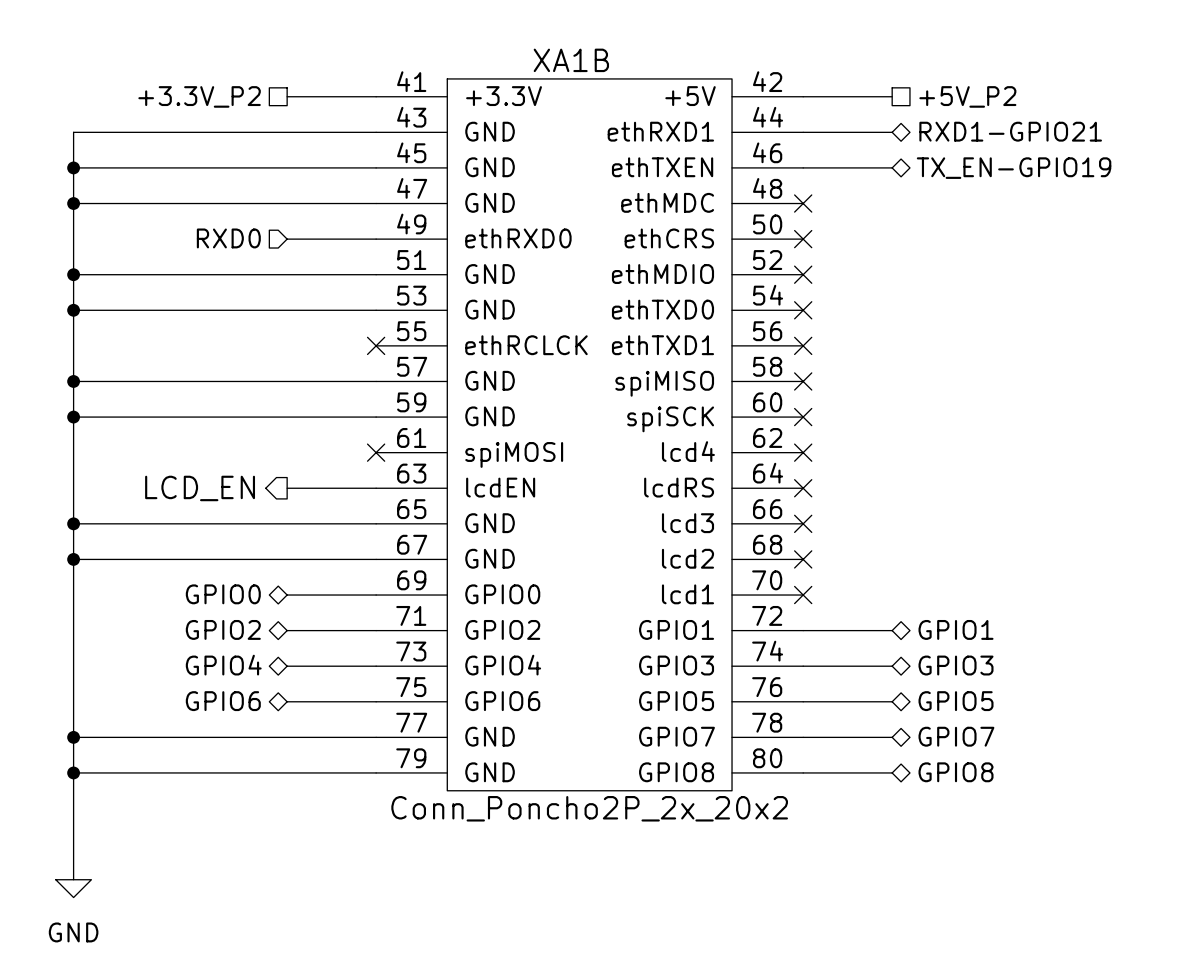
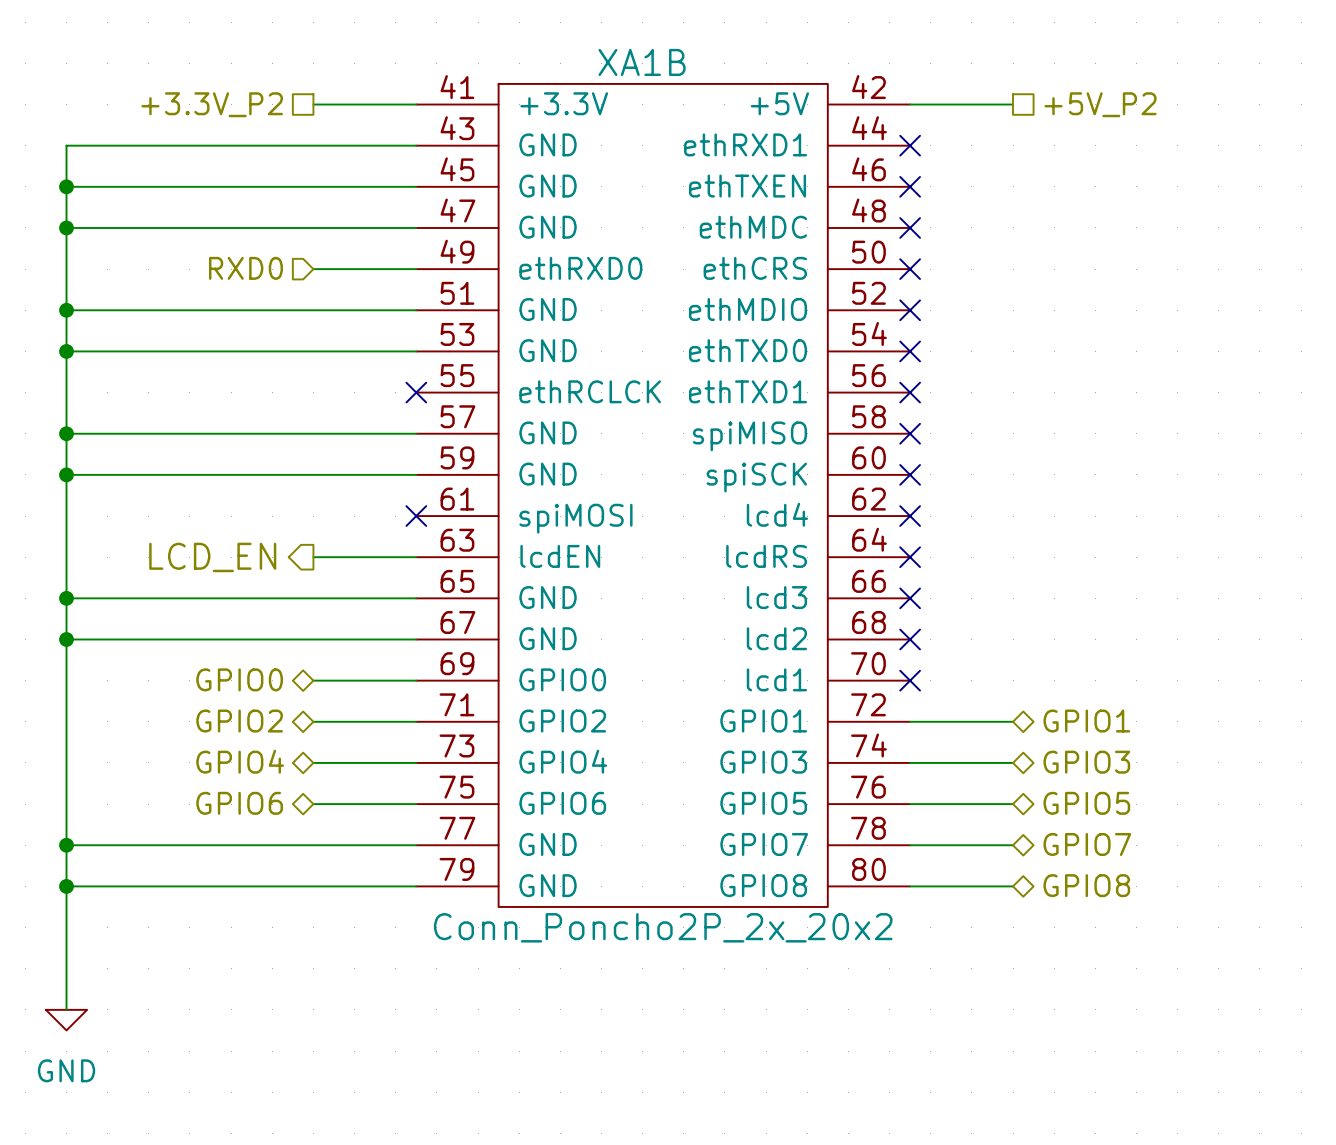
hierarchical label: RXD1-GPIO21 (1010, 131) -> none
wire: (803, 132) (892, 132) -> none
no-connect mark: none -> (910, 145)
wire: (803, 167) (892, 167) -> none
no-connect mark: none -> (910, 186)
hierarchical label: TX_EN-GPIO19 (1014, 168) -> none

